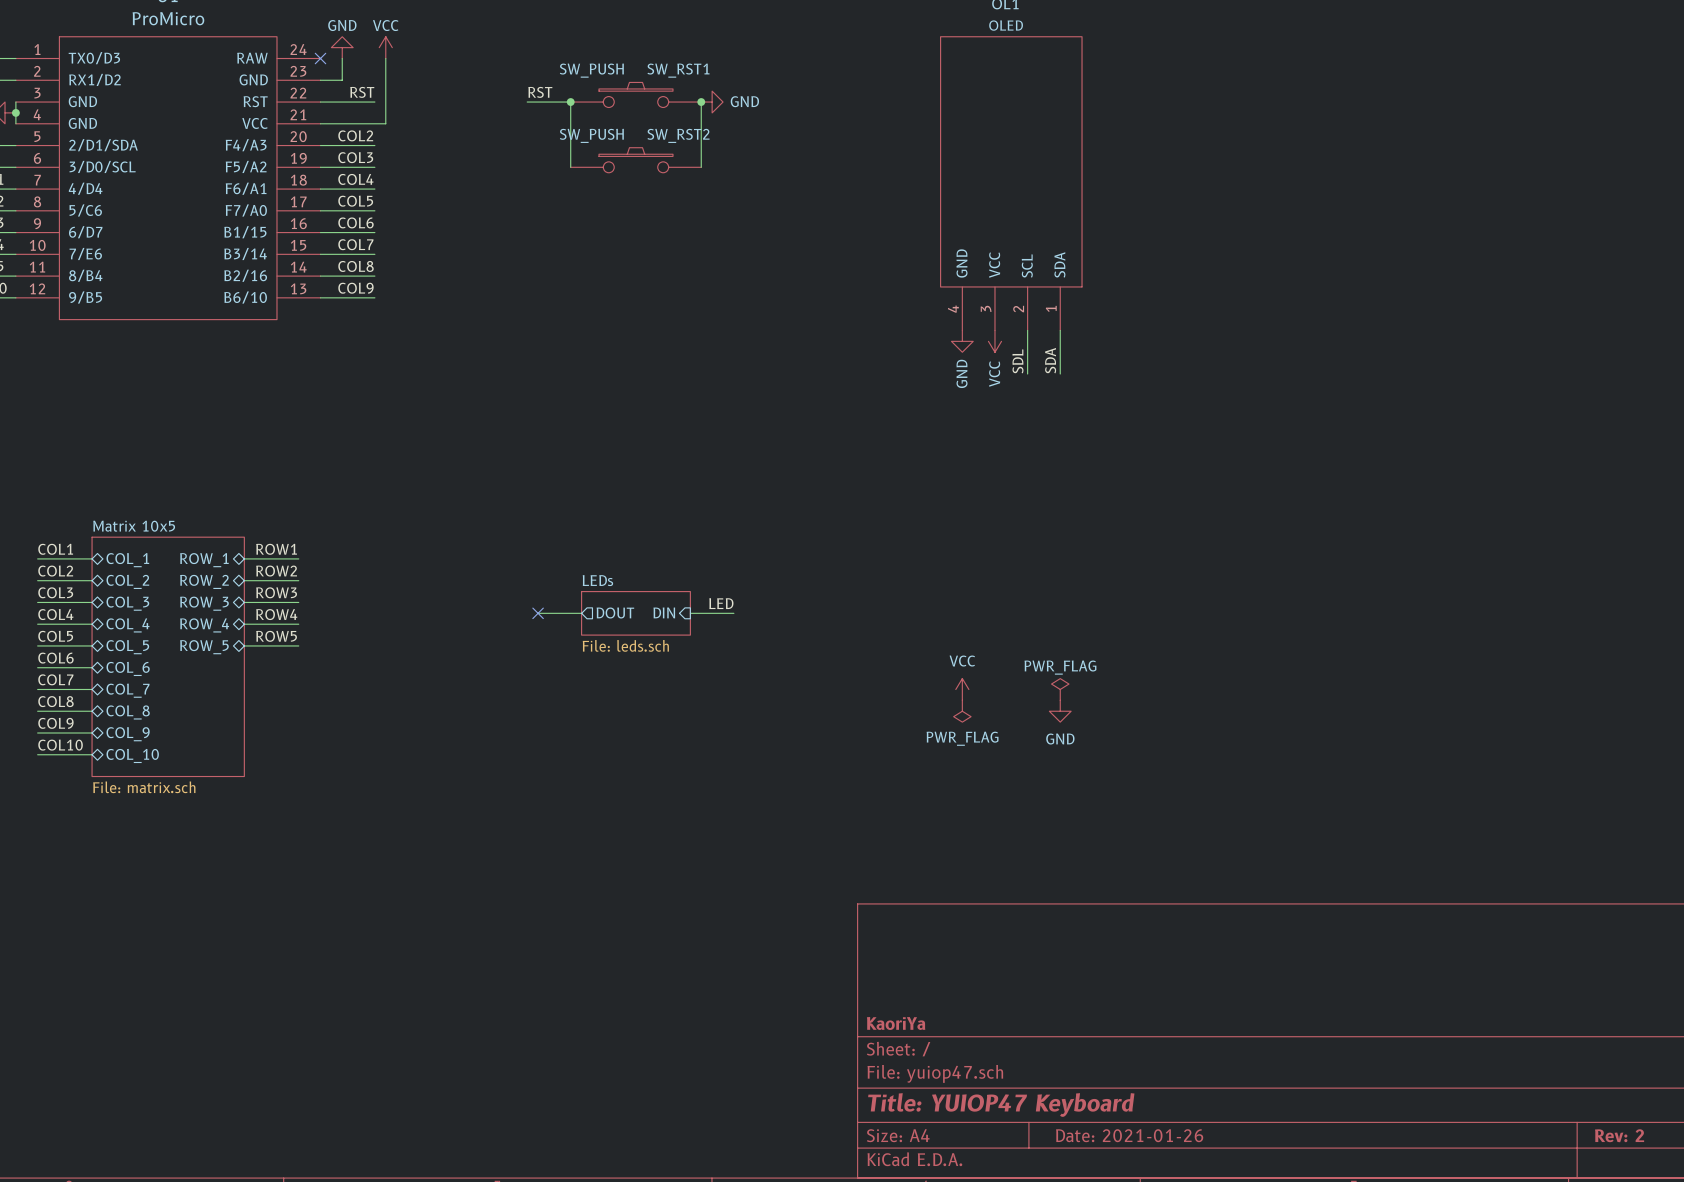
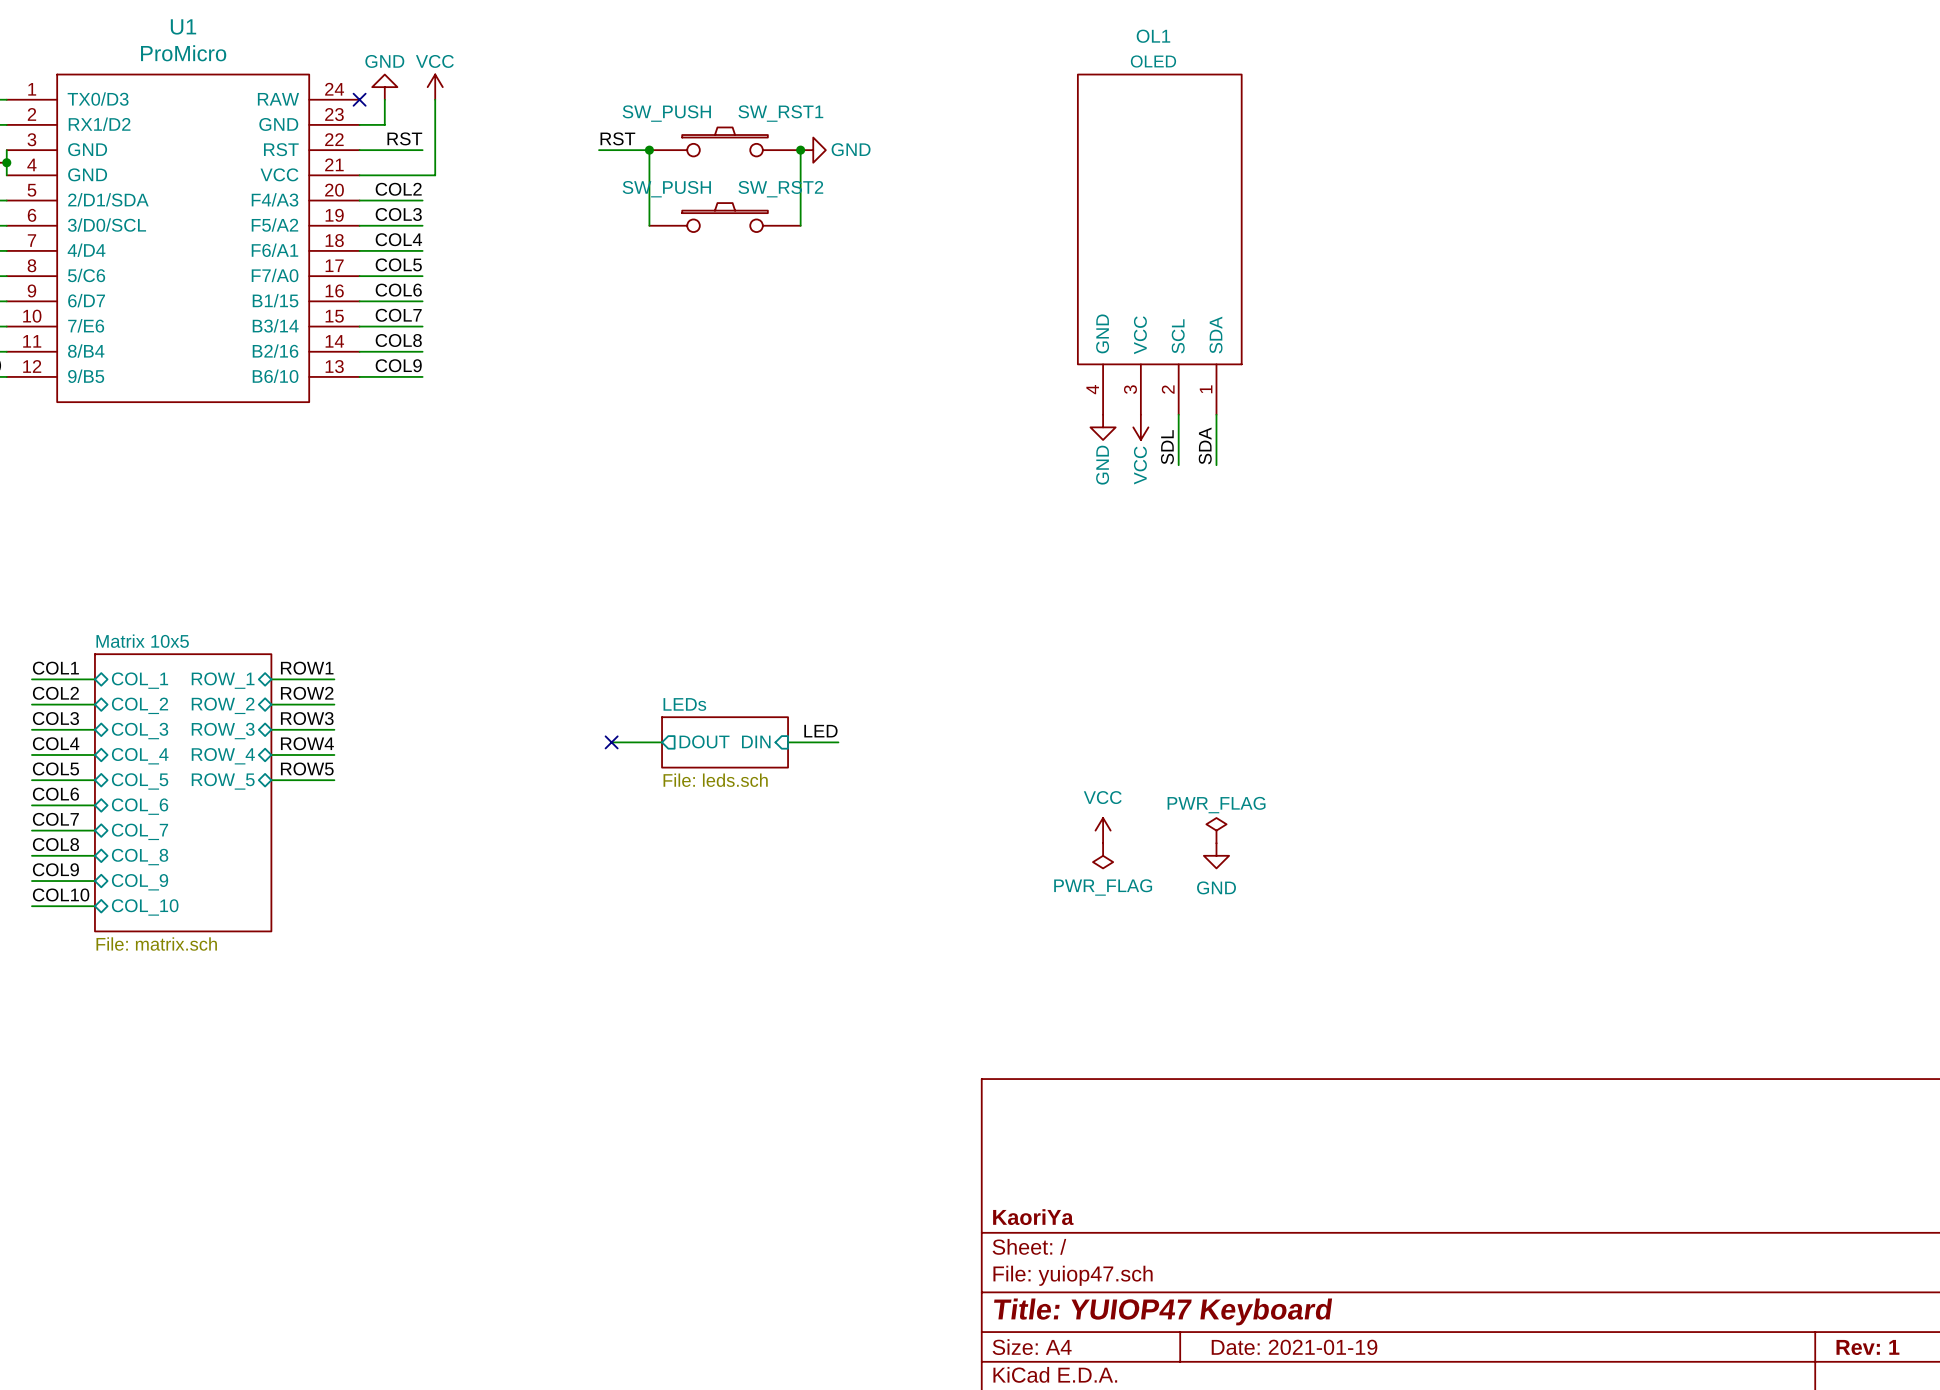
title block: Date: 2021-01-26 (1129, 1135) -> Date: 2021-01-19 (1294, 1347)
title block: Rev: 2 (1619, 1135) -> Rev: 1 (1867, 1347)

